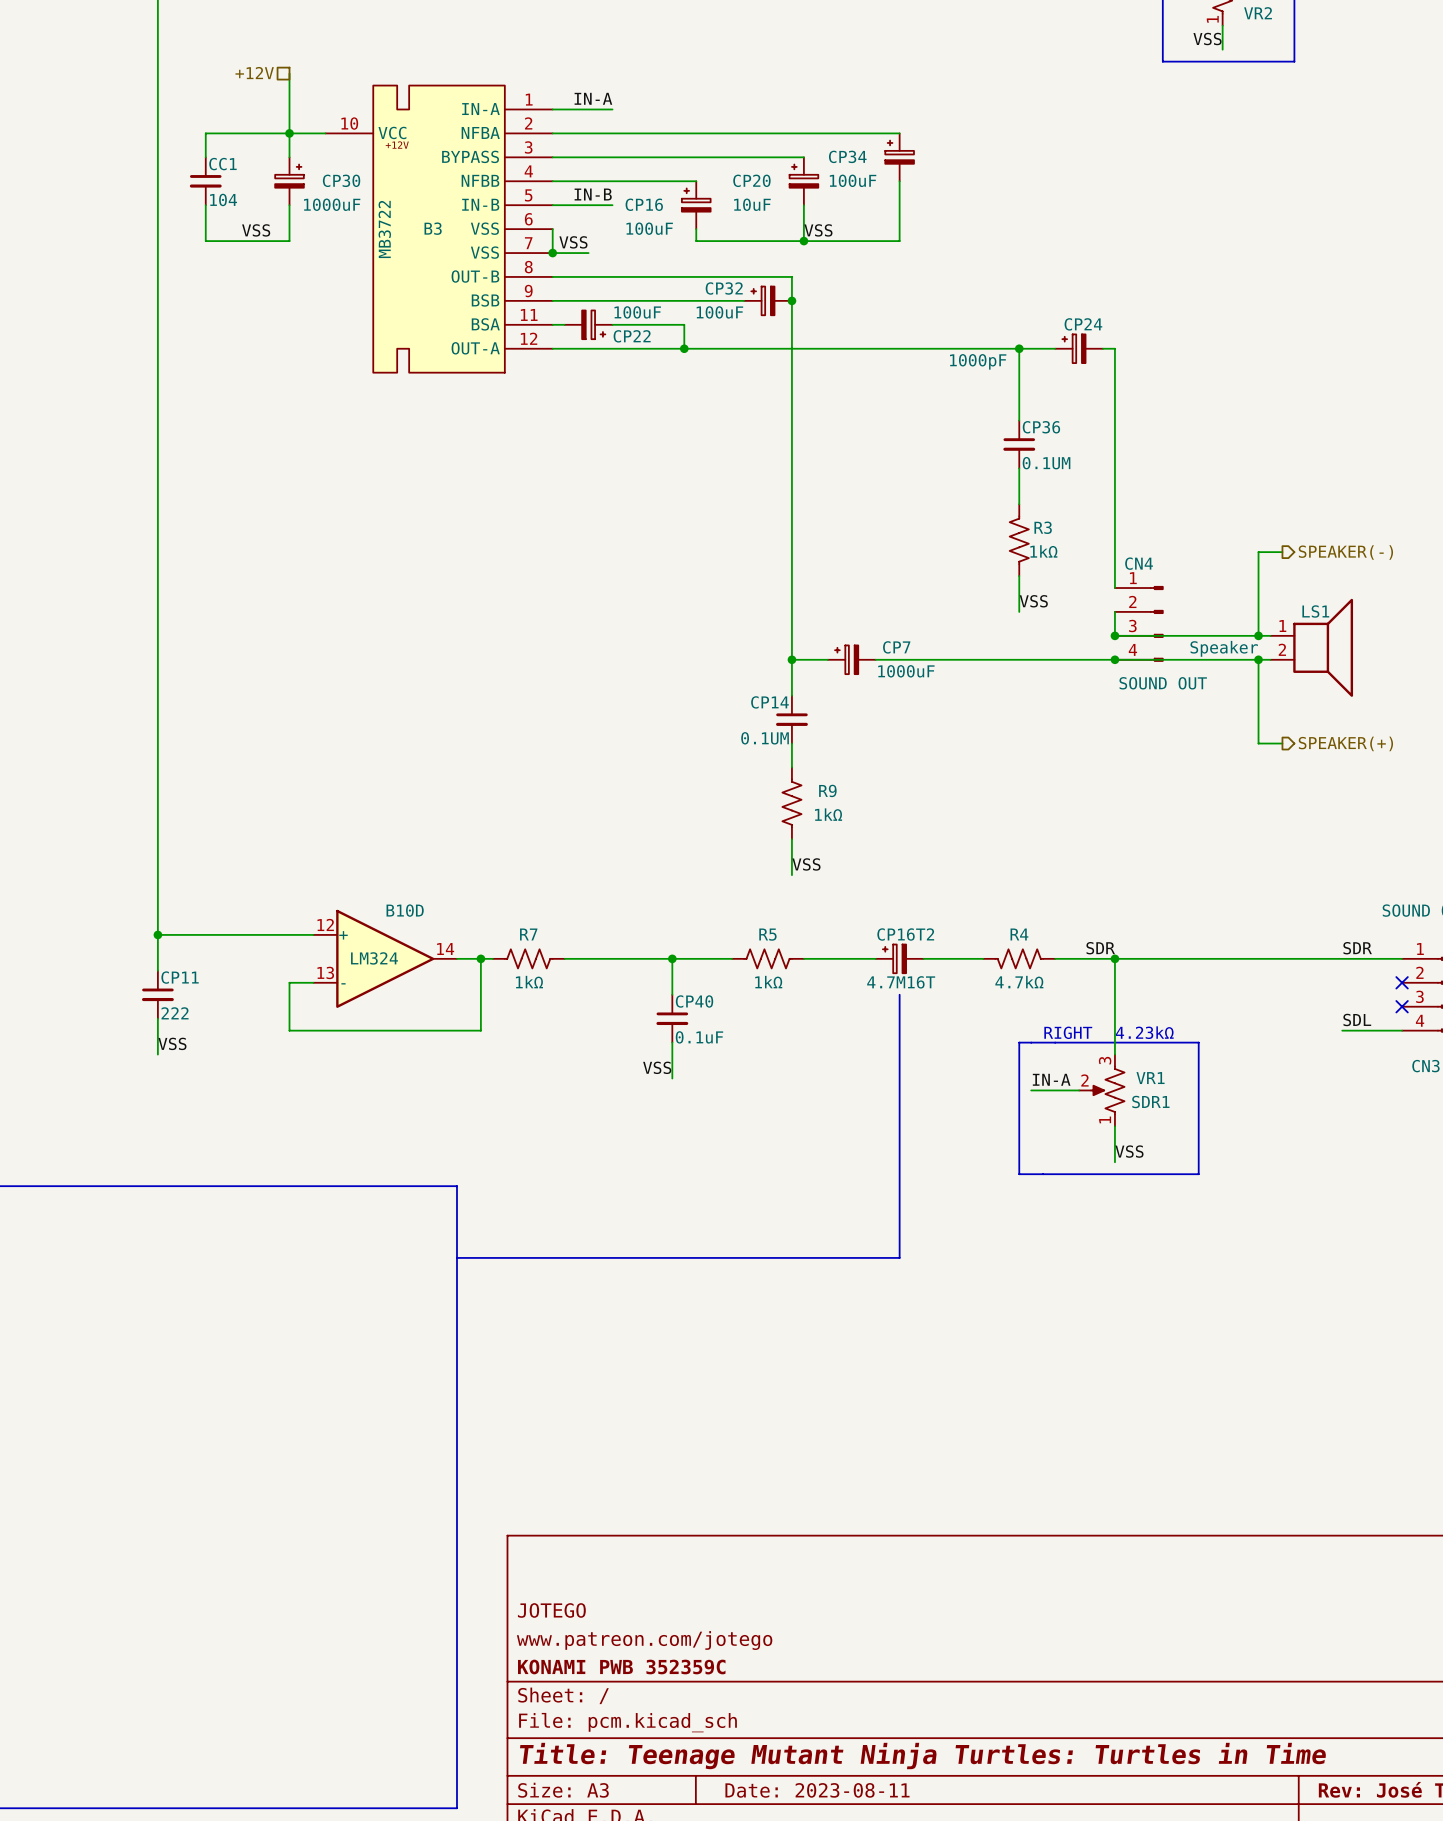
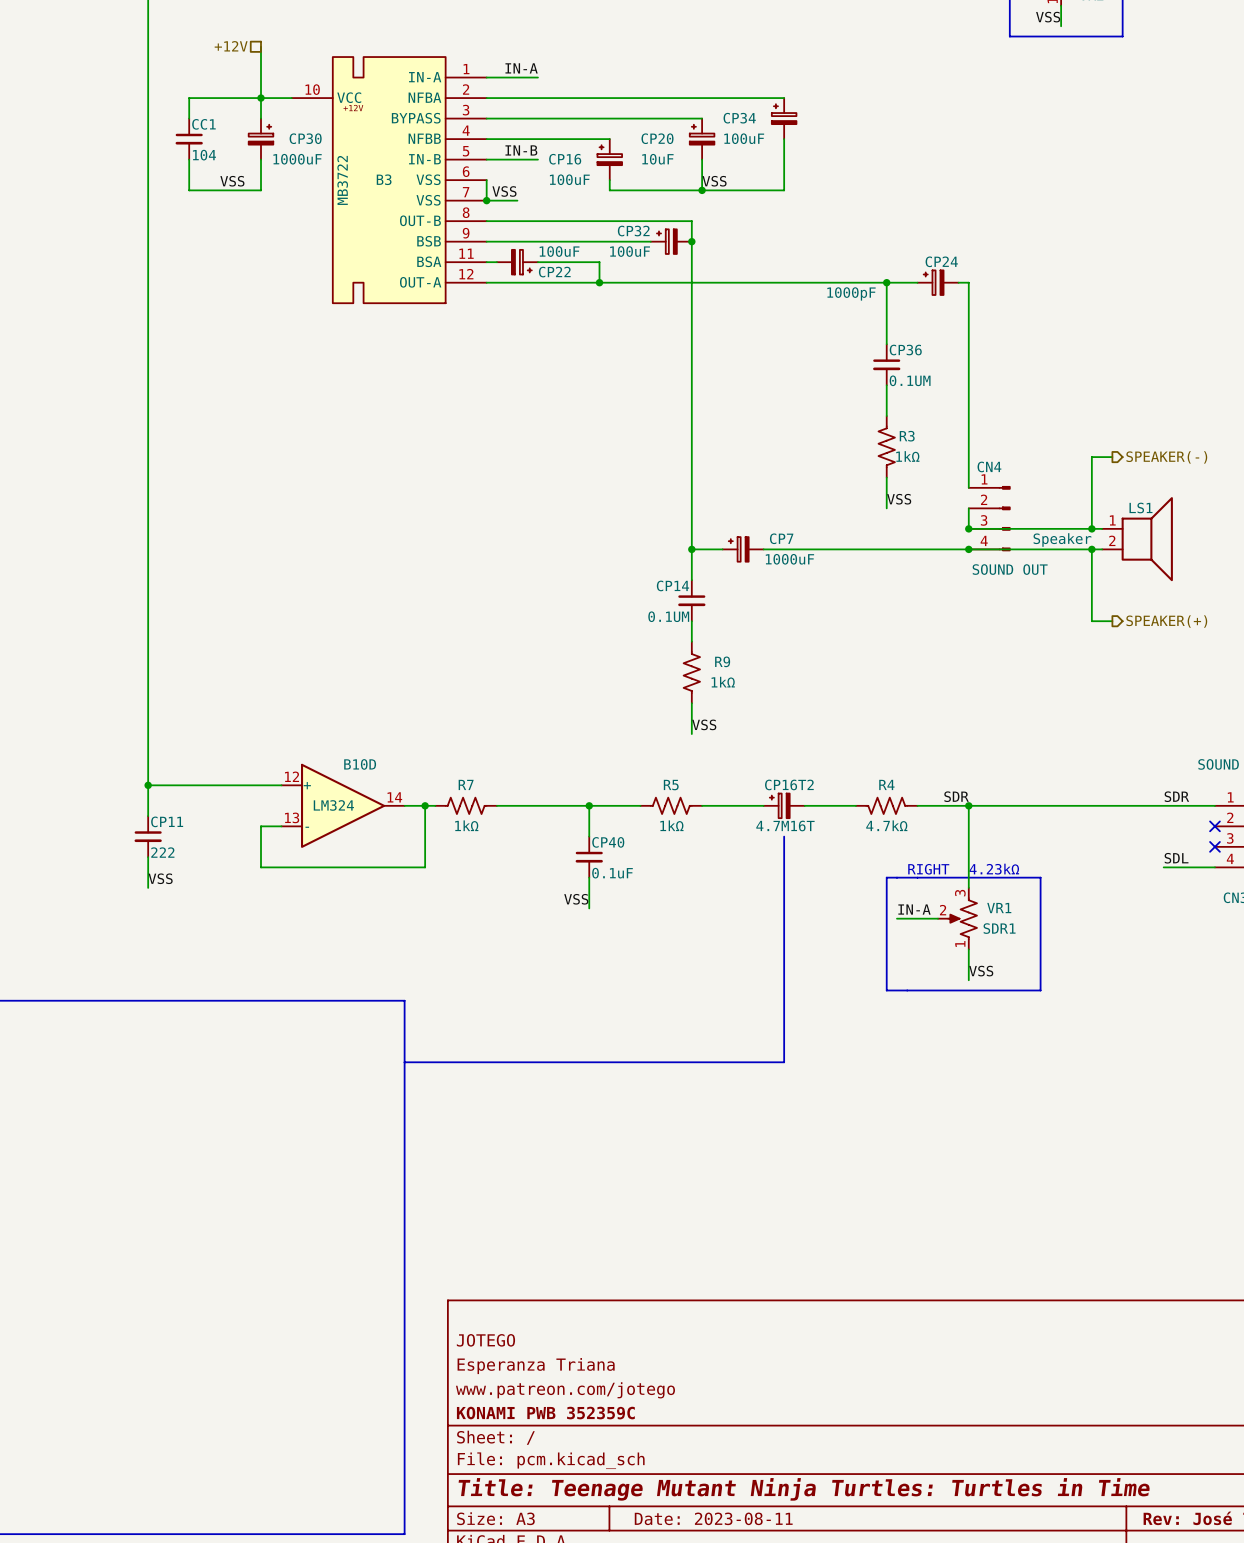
title block: none -> JOTEGO (485, 1340)
title block: JOTEGO (551, 1610) -> Esperanza Triana (536, 1366)

